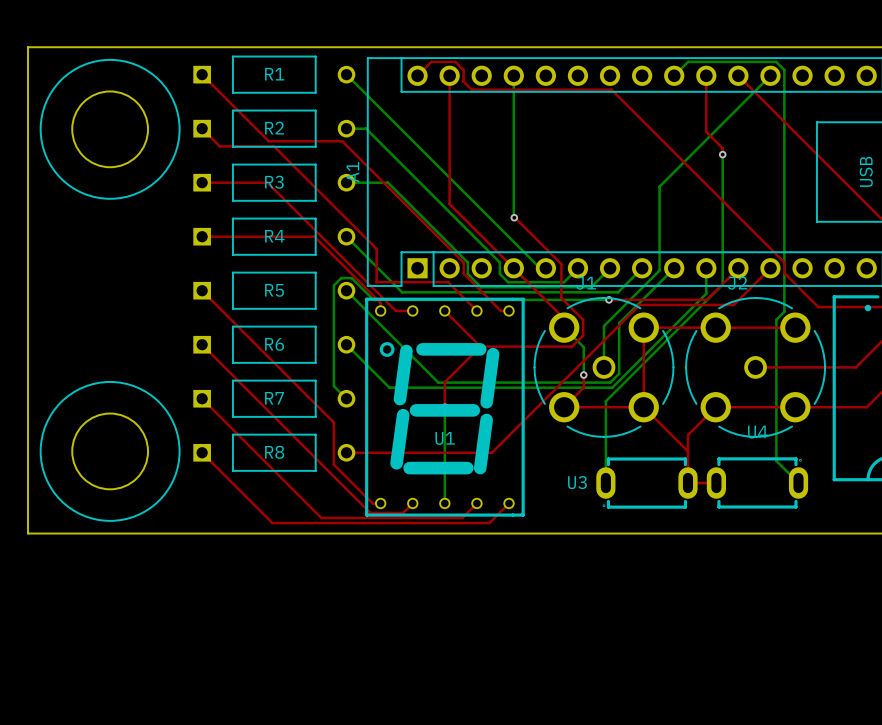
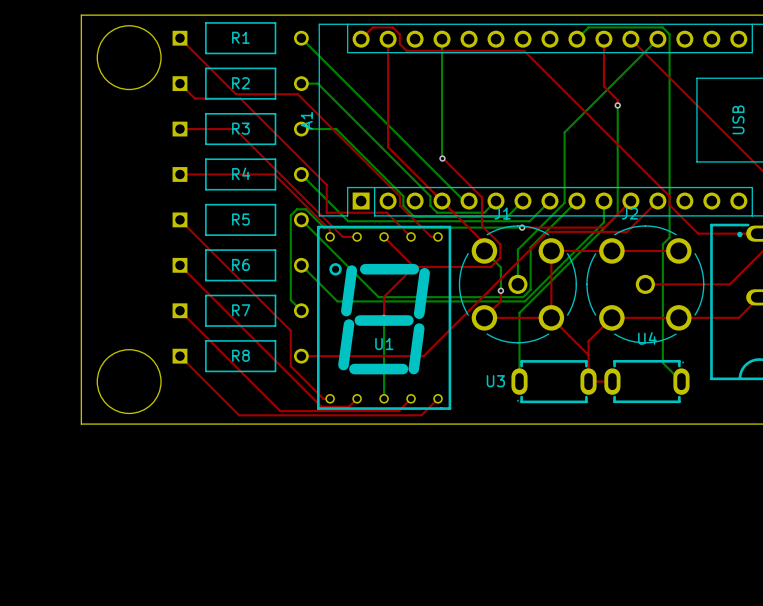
board edge: (84, 47) (28, 47) (28, 533) (84, 533) -> (81, 15) (81, 424)
drawing: [40, 59, 181, 200] -> none
round board edge position: (110, 129) -> (129, 57)
drawing: [40, 381, 181, 522] -> none
round board edge position: (110, 451) -> (129, 381)

